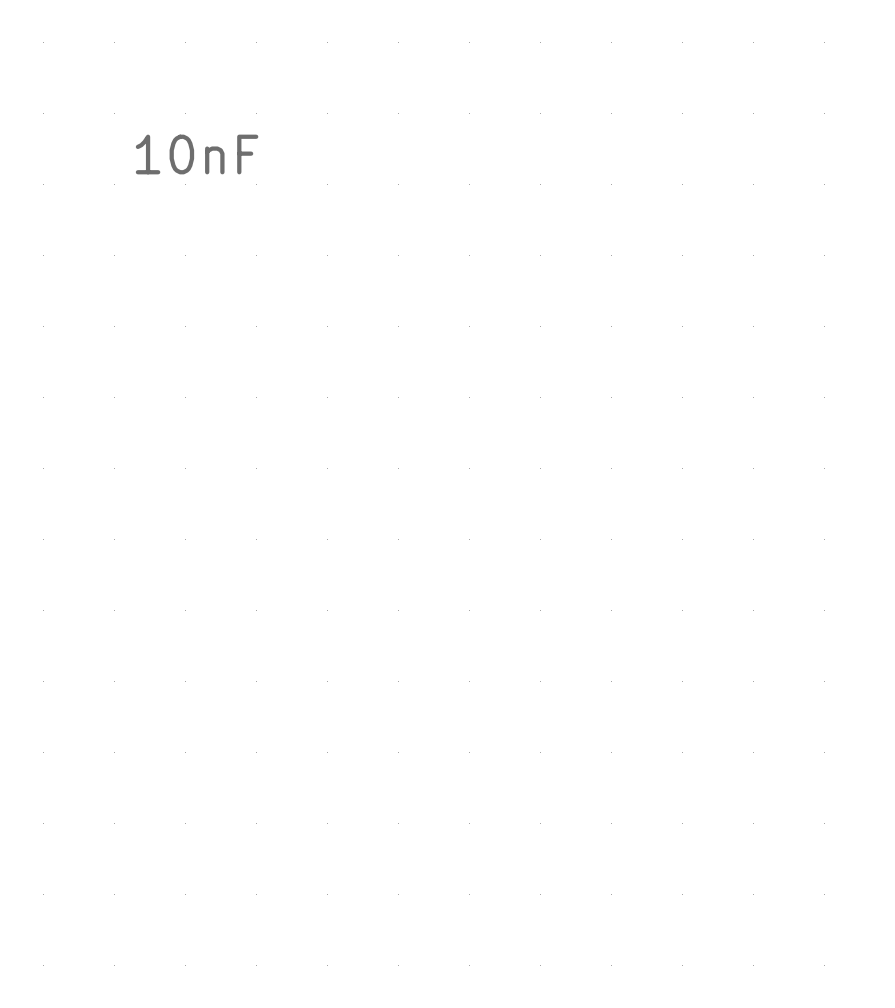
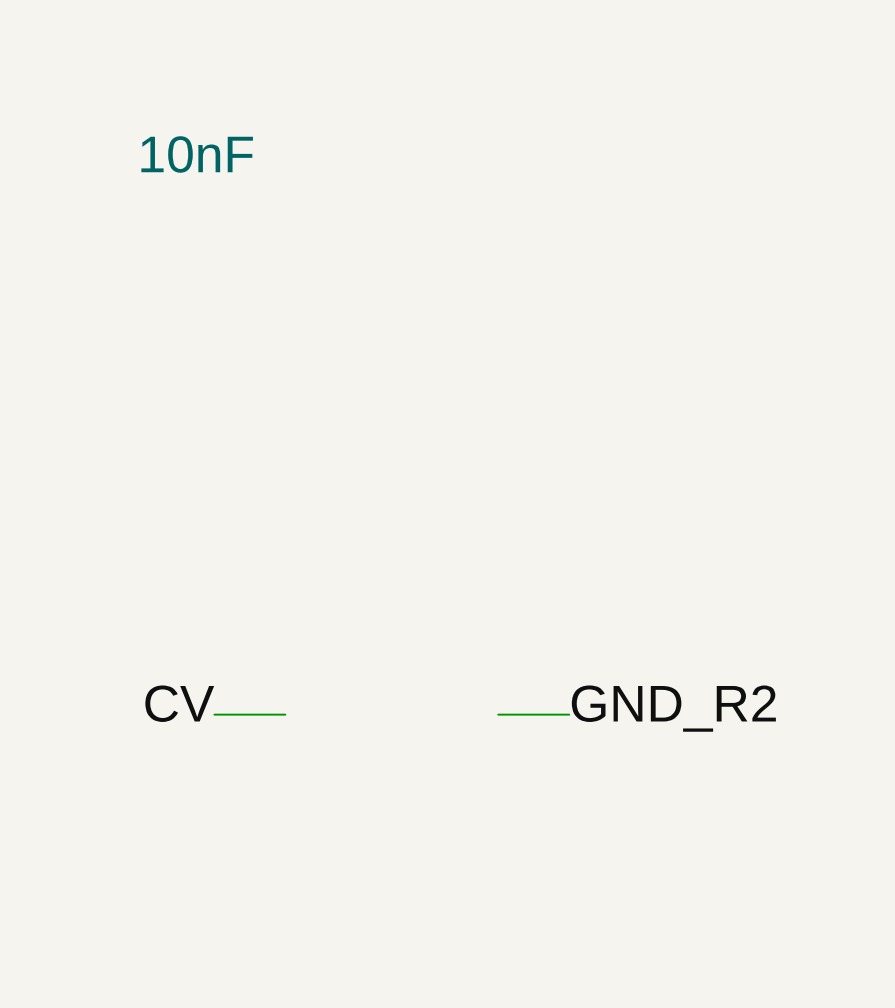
label: none -> CV (179, 703)
label: none -> GND_R2 (673, 708)
wire: none -> (214, 714) (285, 714)
wire: none -> (498, 714) (569, 714)

